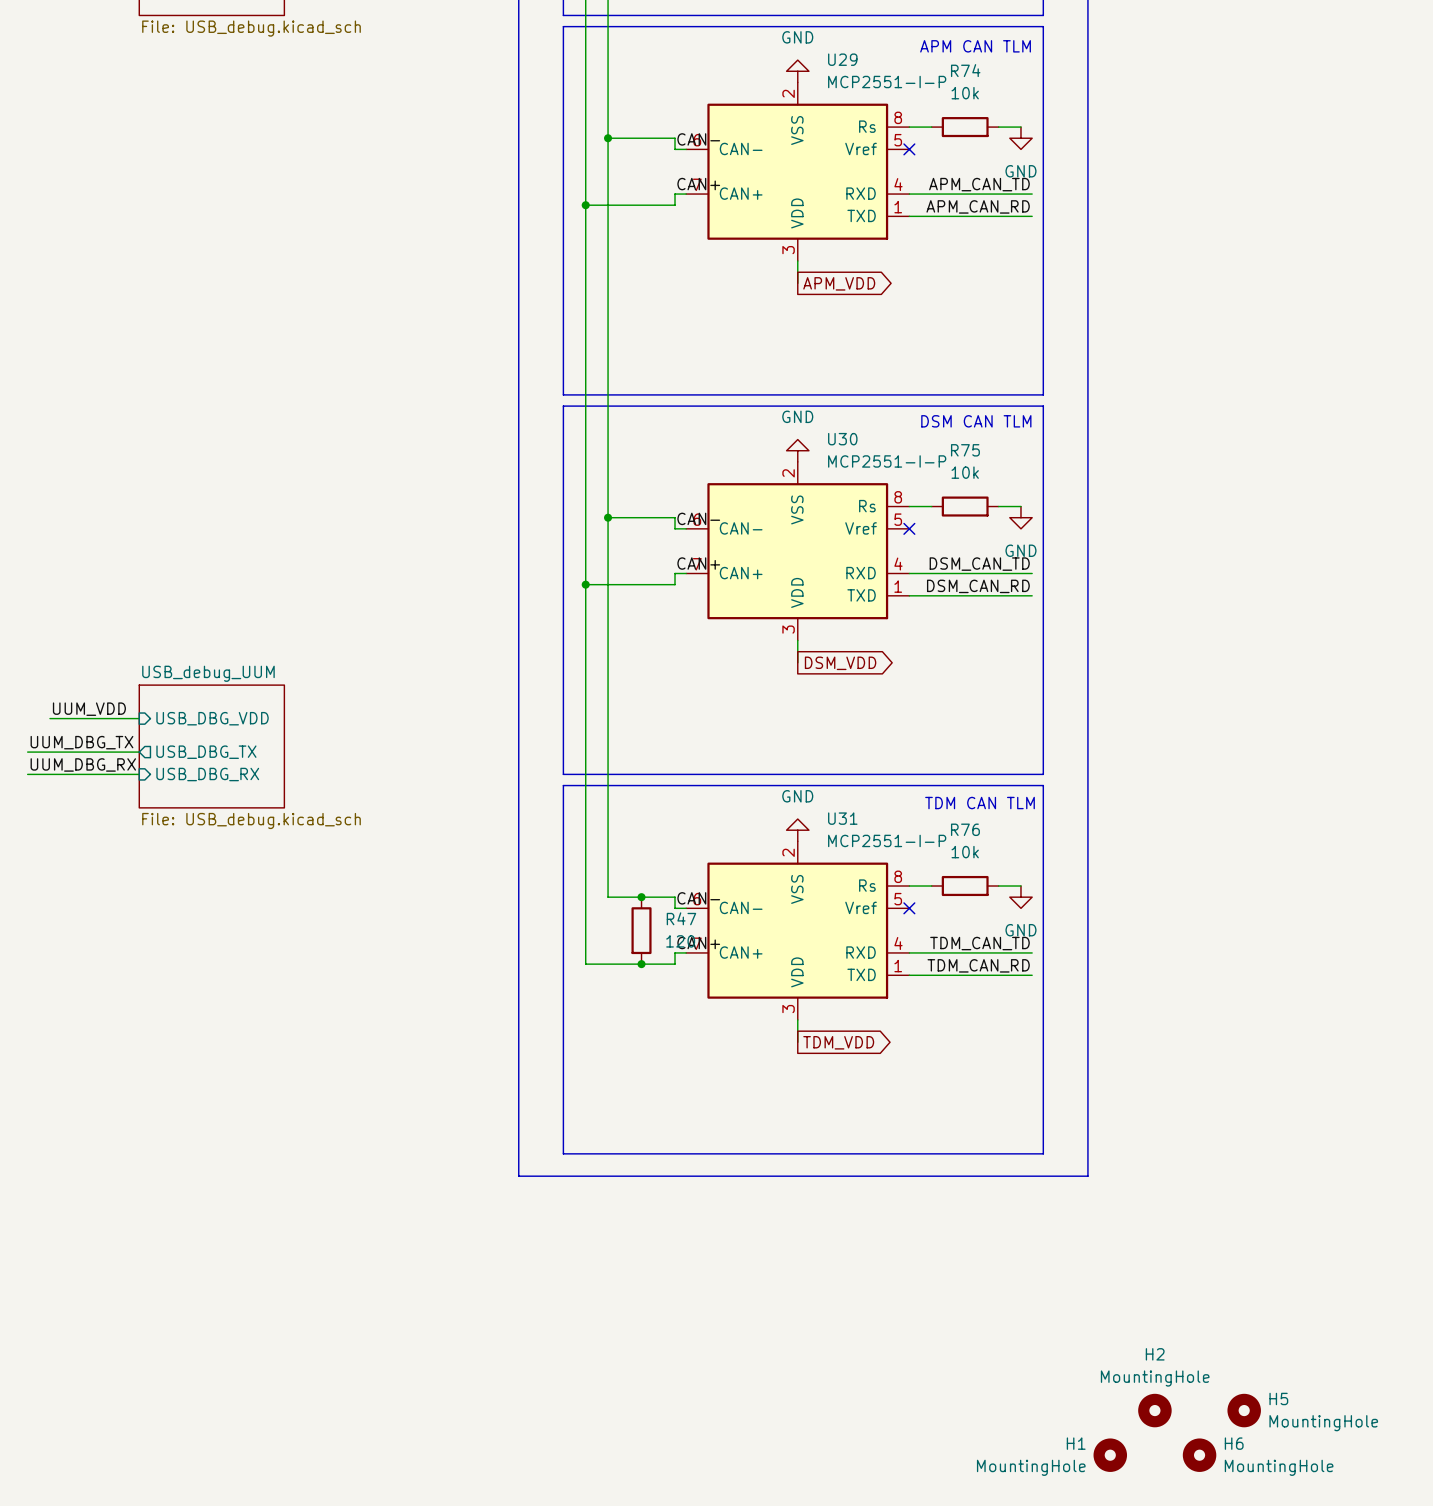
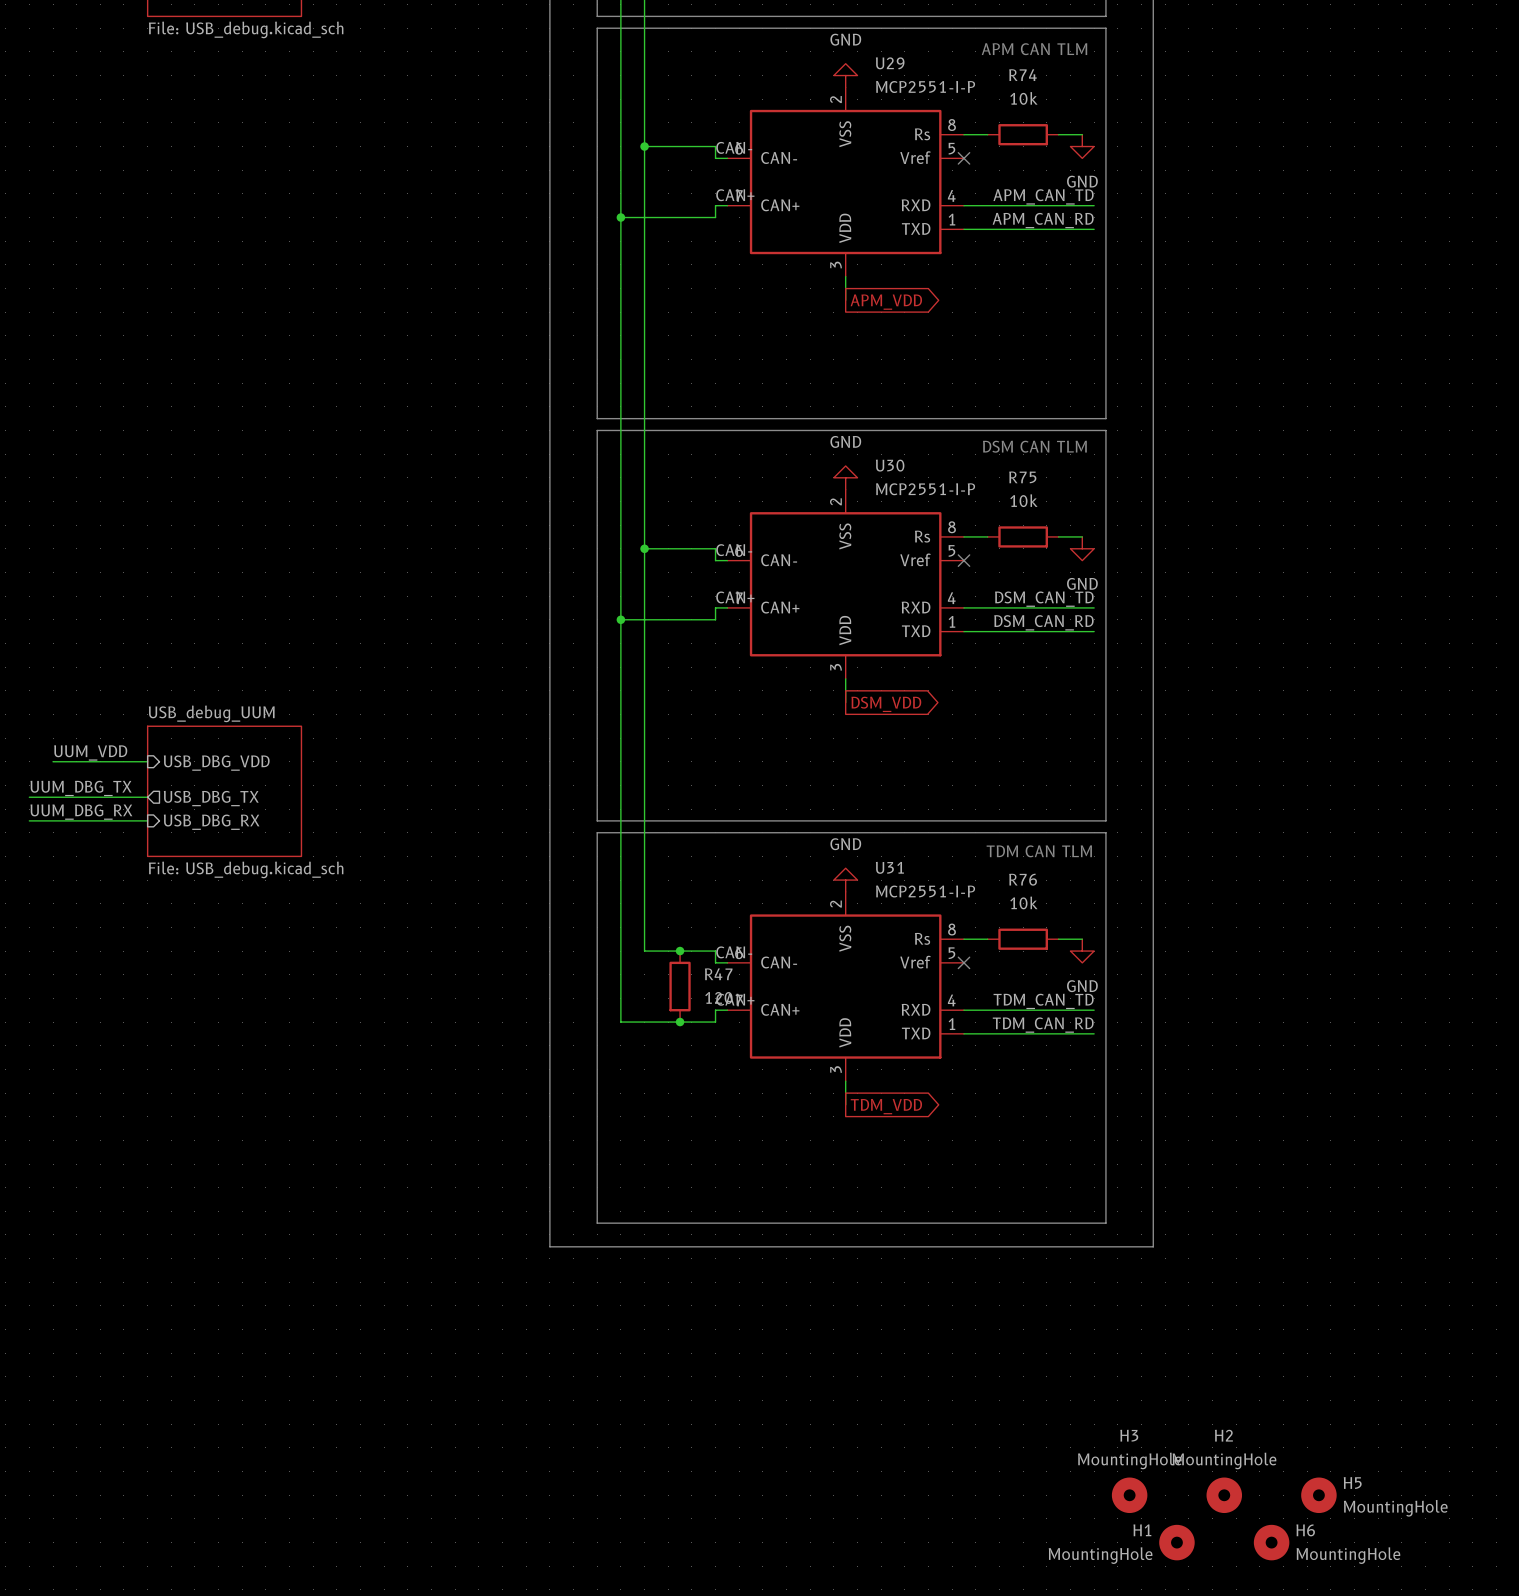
H3: none -> MountingHole (1129, 1495)

